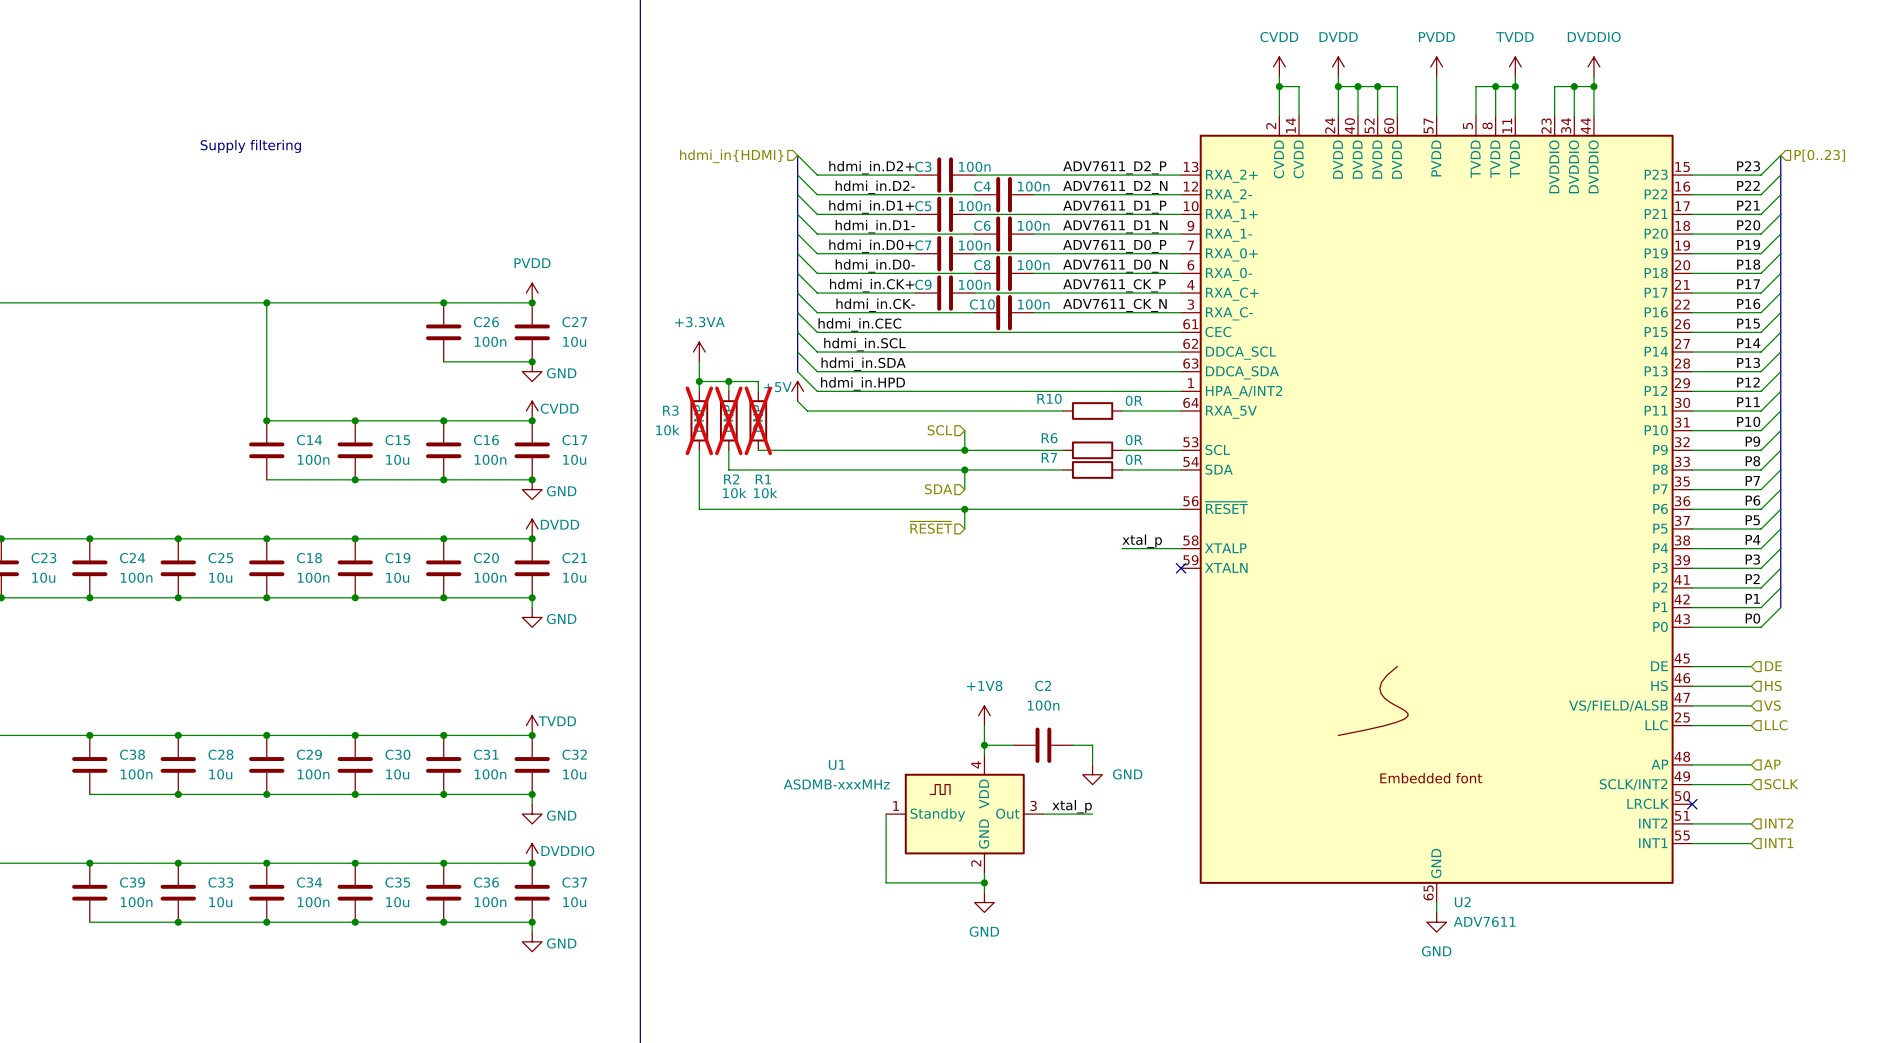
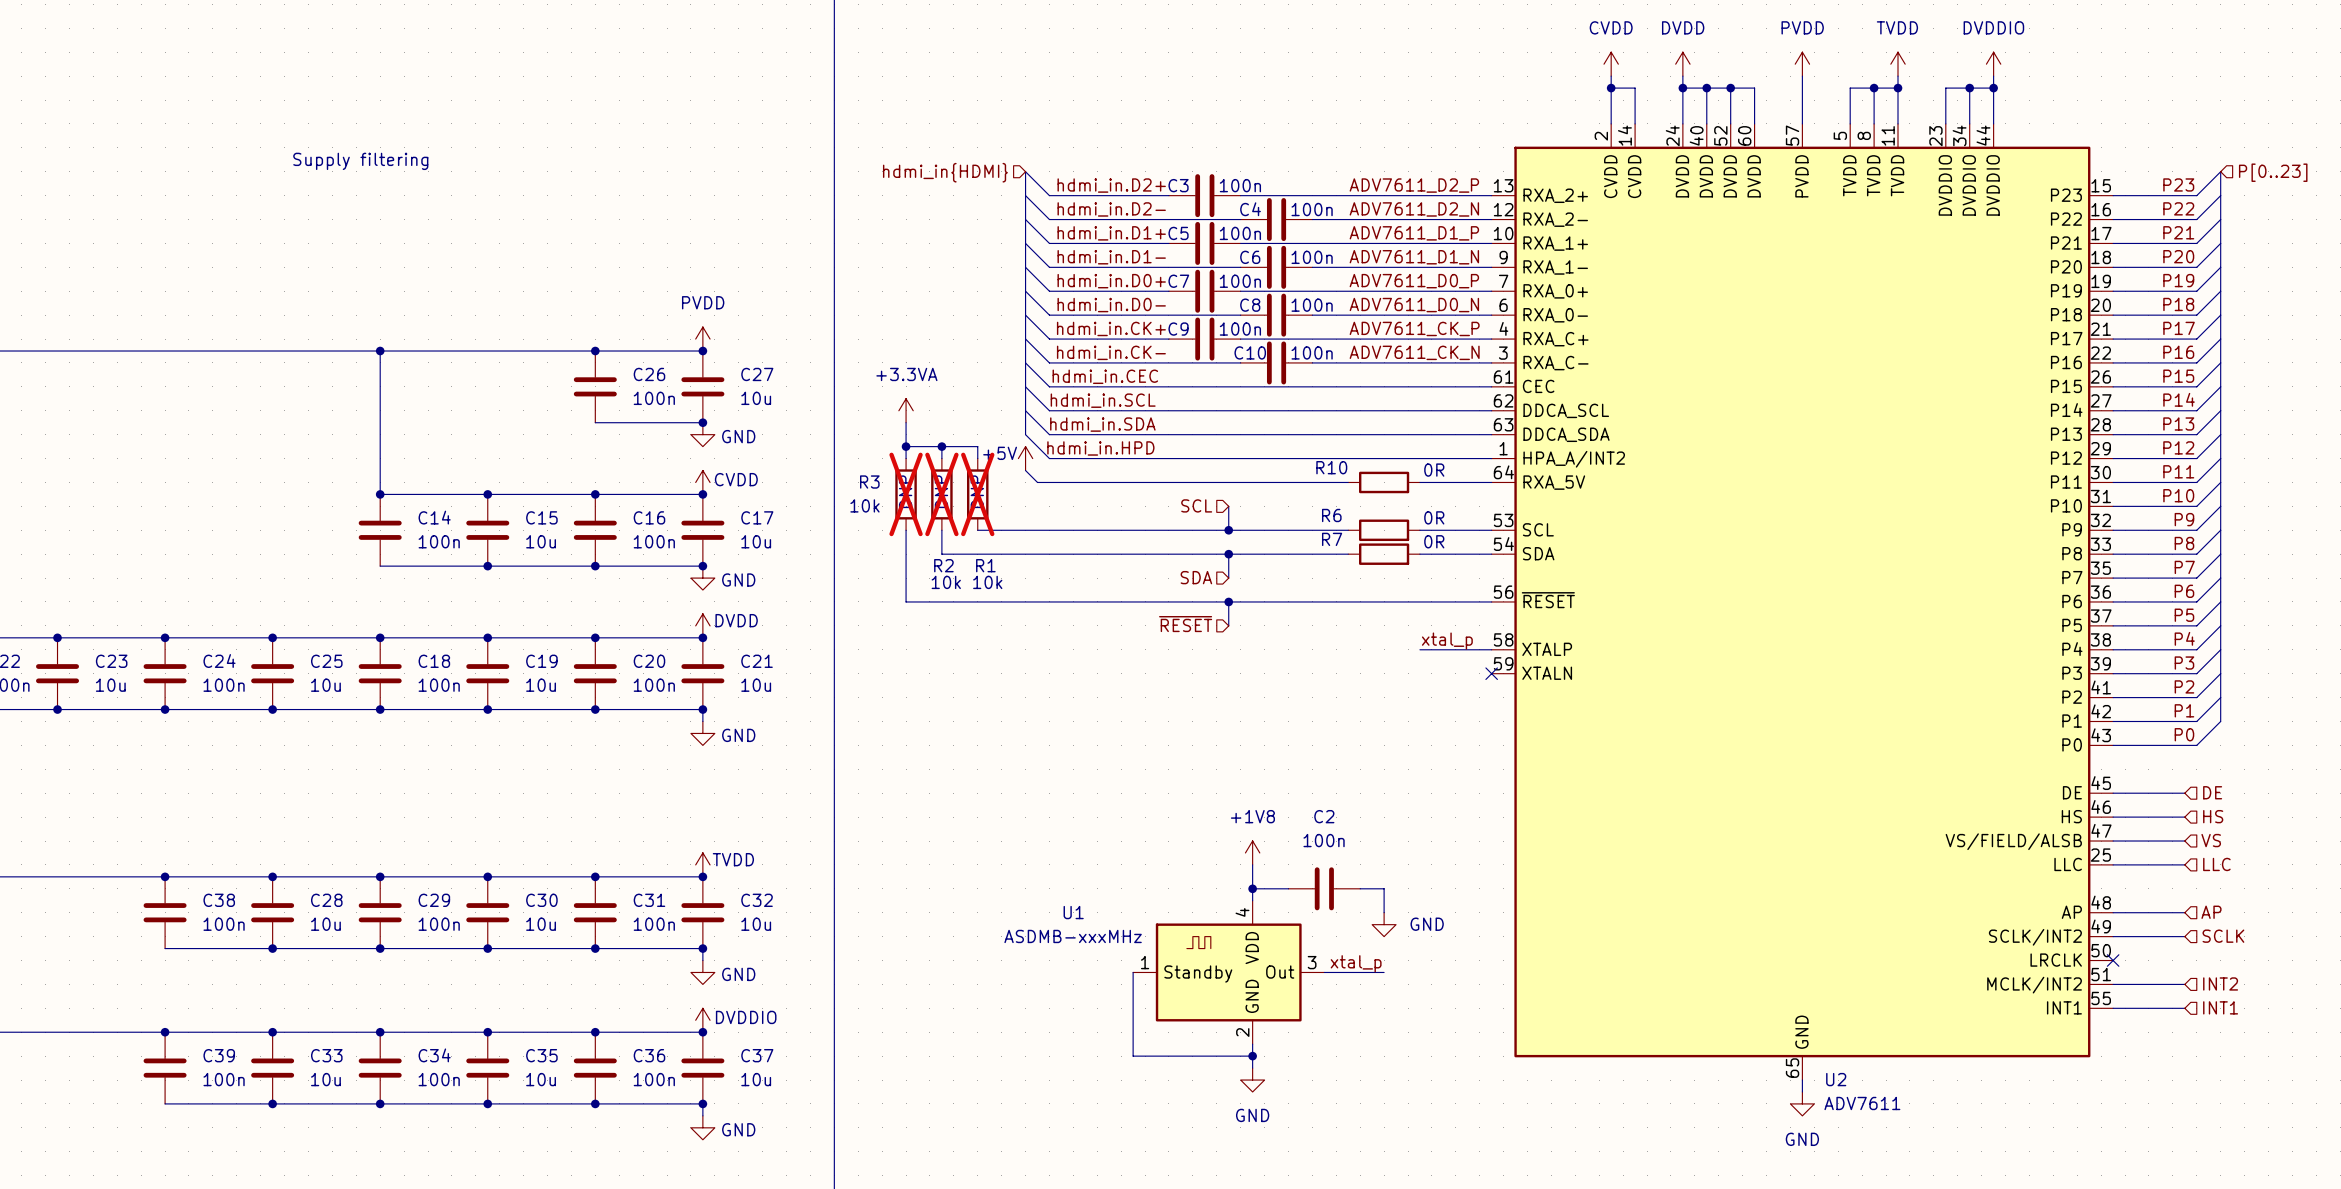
U2 symbol: [1181, 116, 1693, 903] -> [1491, 123, 2114, 1081]

